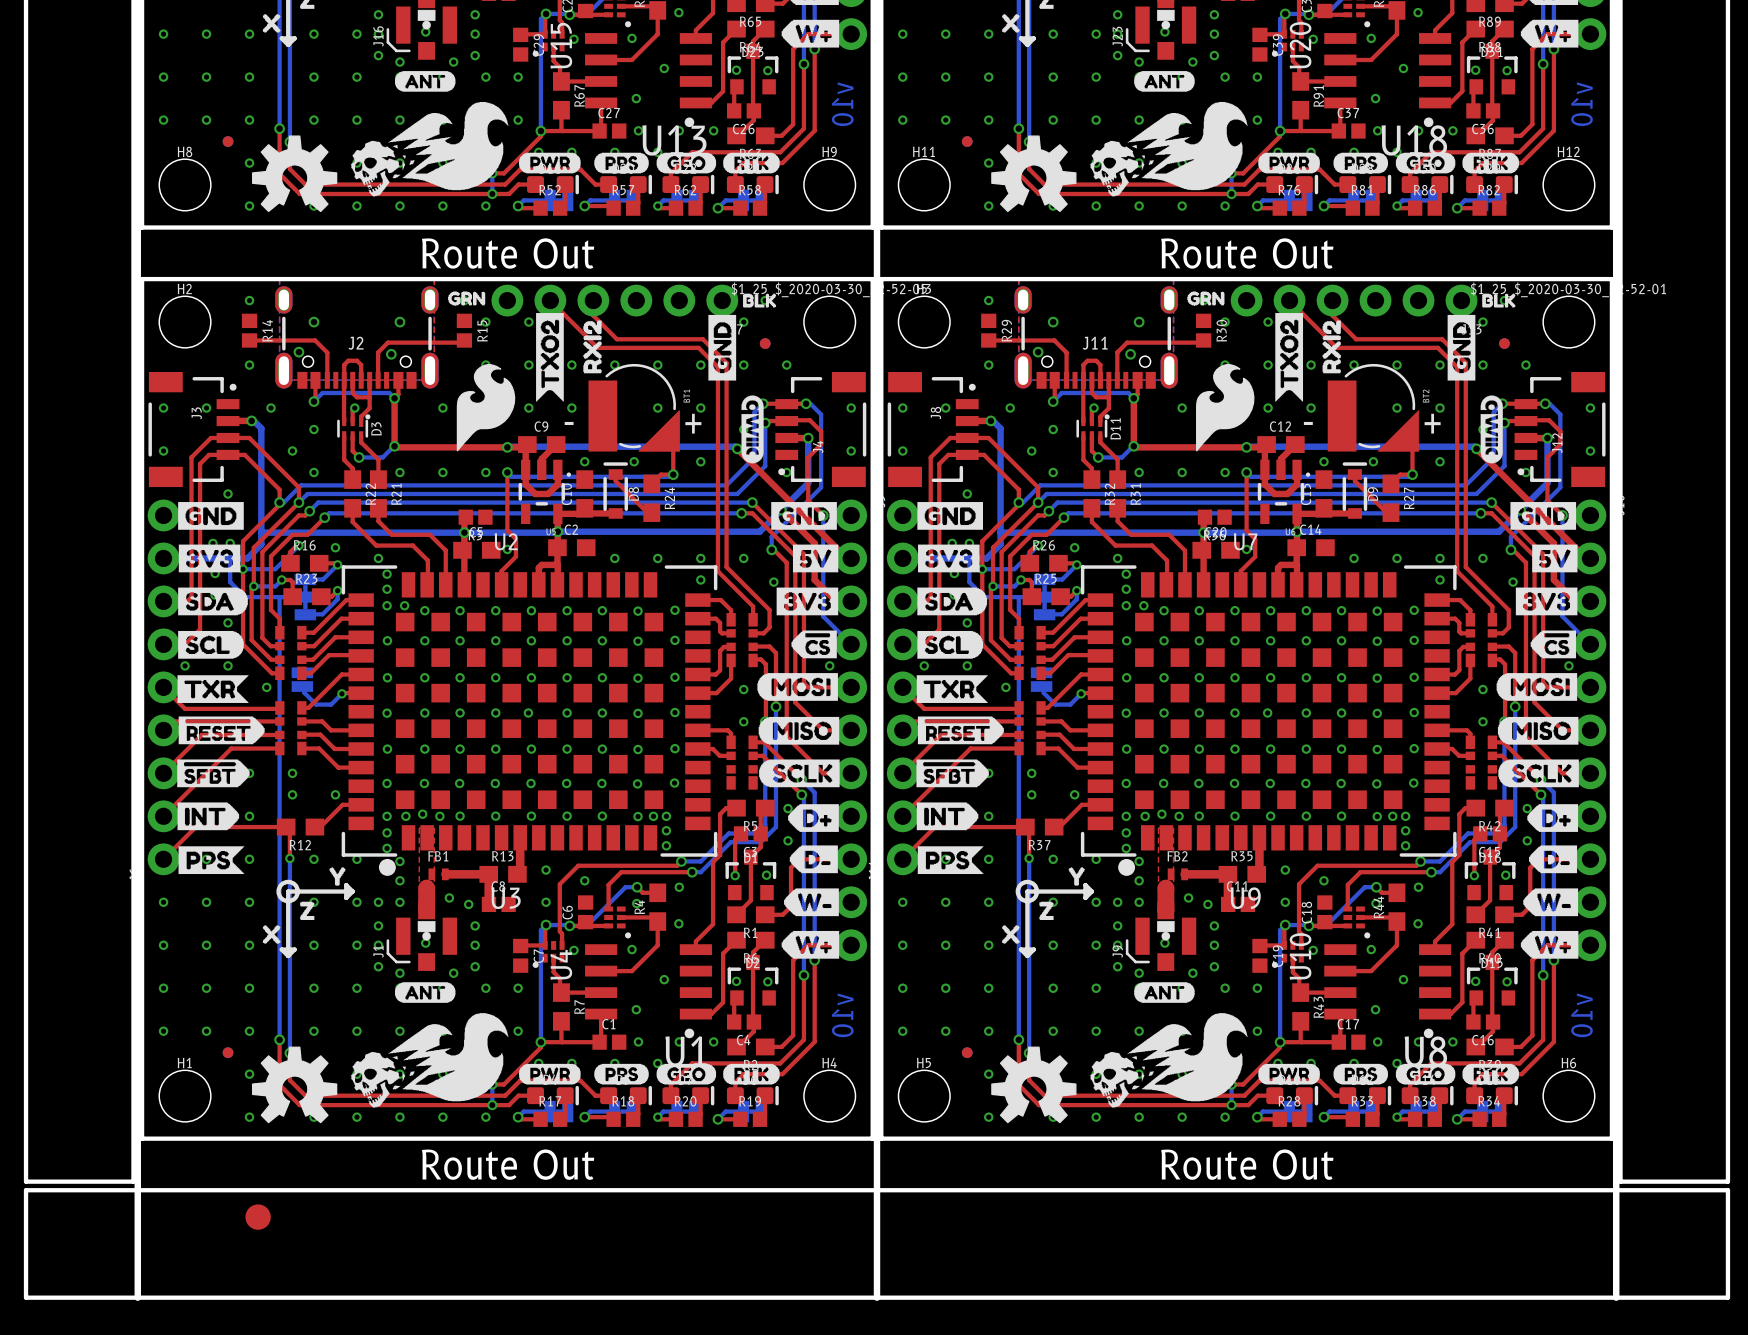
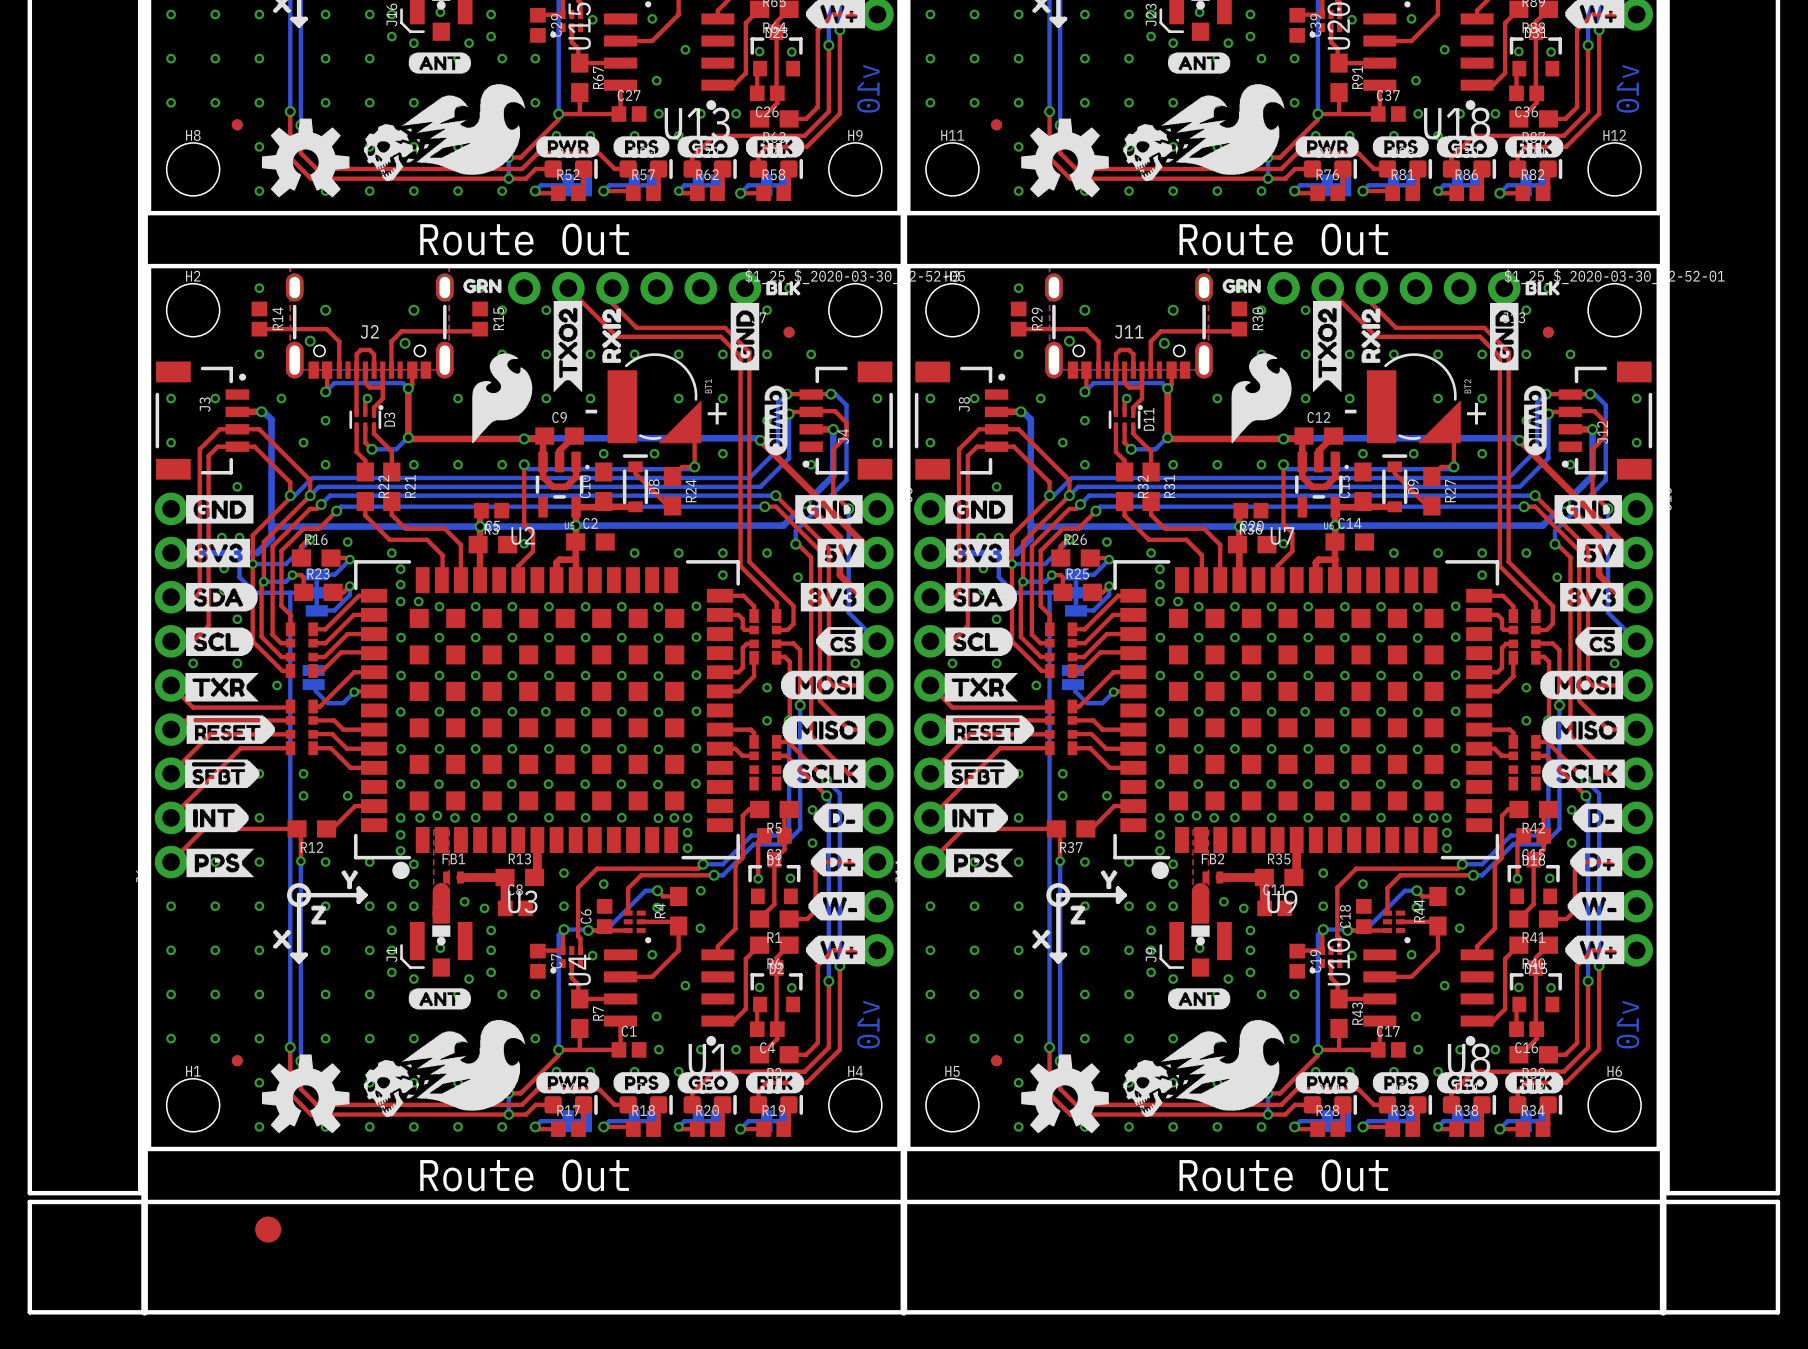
drawing position: (813, 818) -> (836, 862)
drawing position: (1552, 818) -> (1596, 862)
drawing position: (813, 859) -> (838, 817)
drawing position: (1553, 859) -> (1597, 817)

